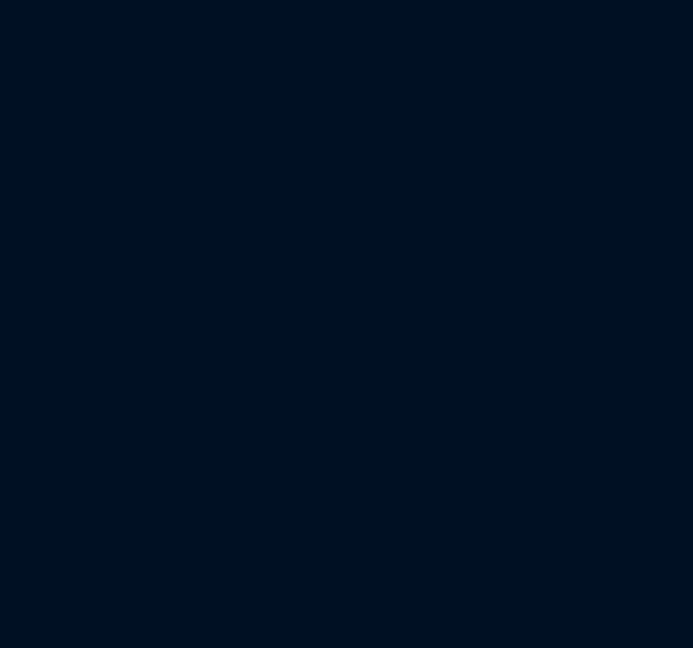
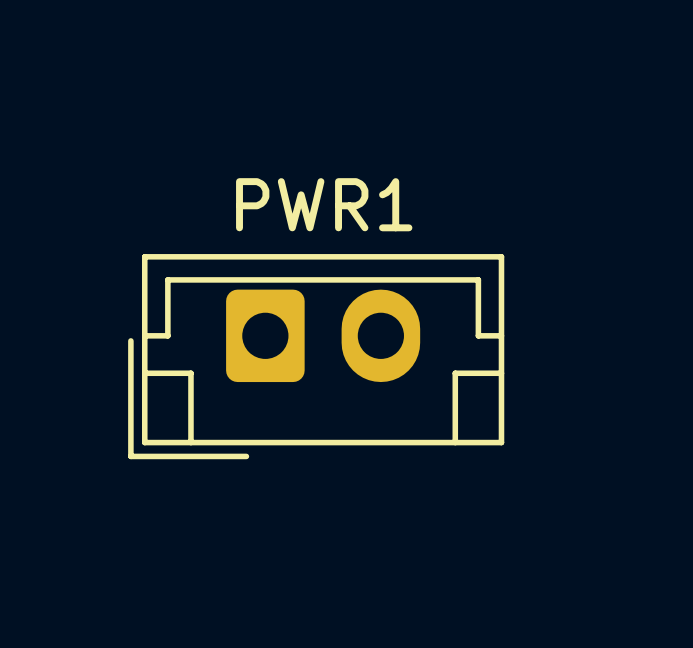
PWR1: none -> (316, 356)

